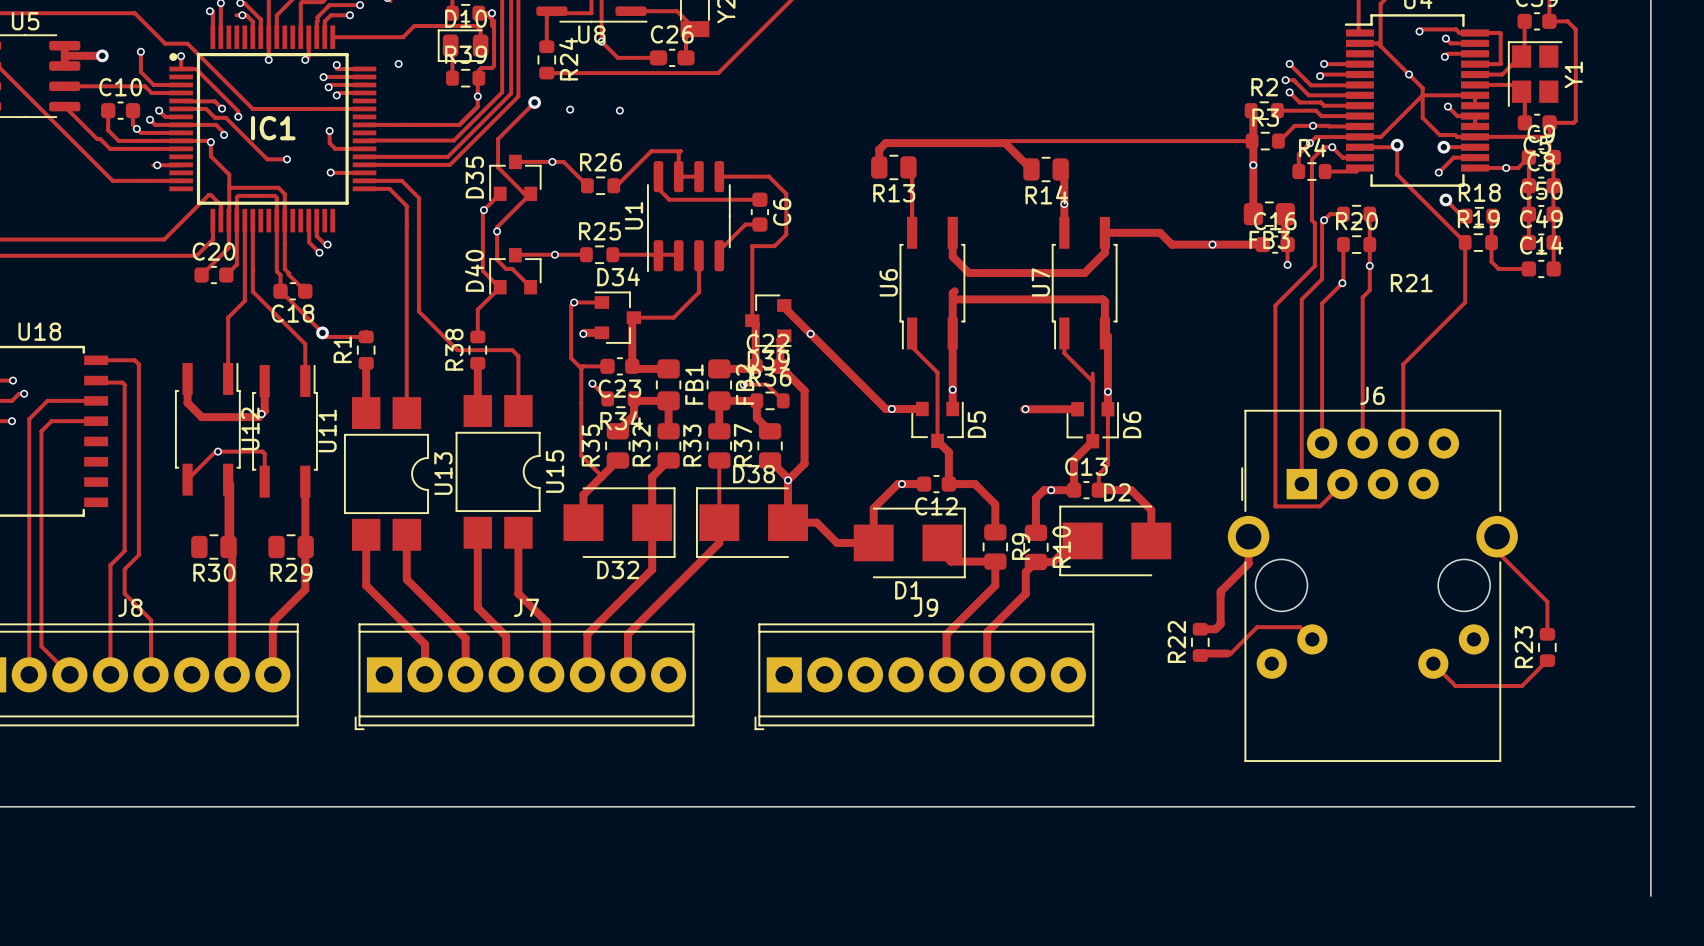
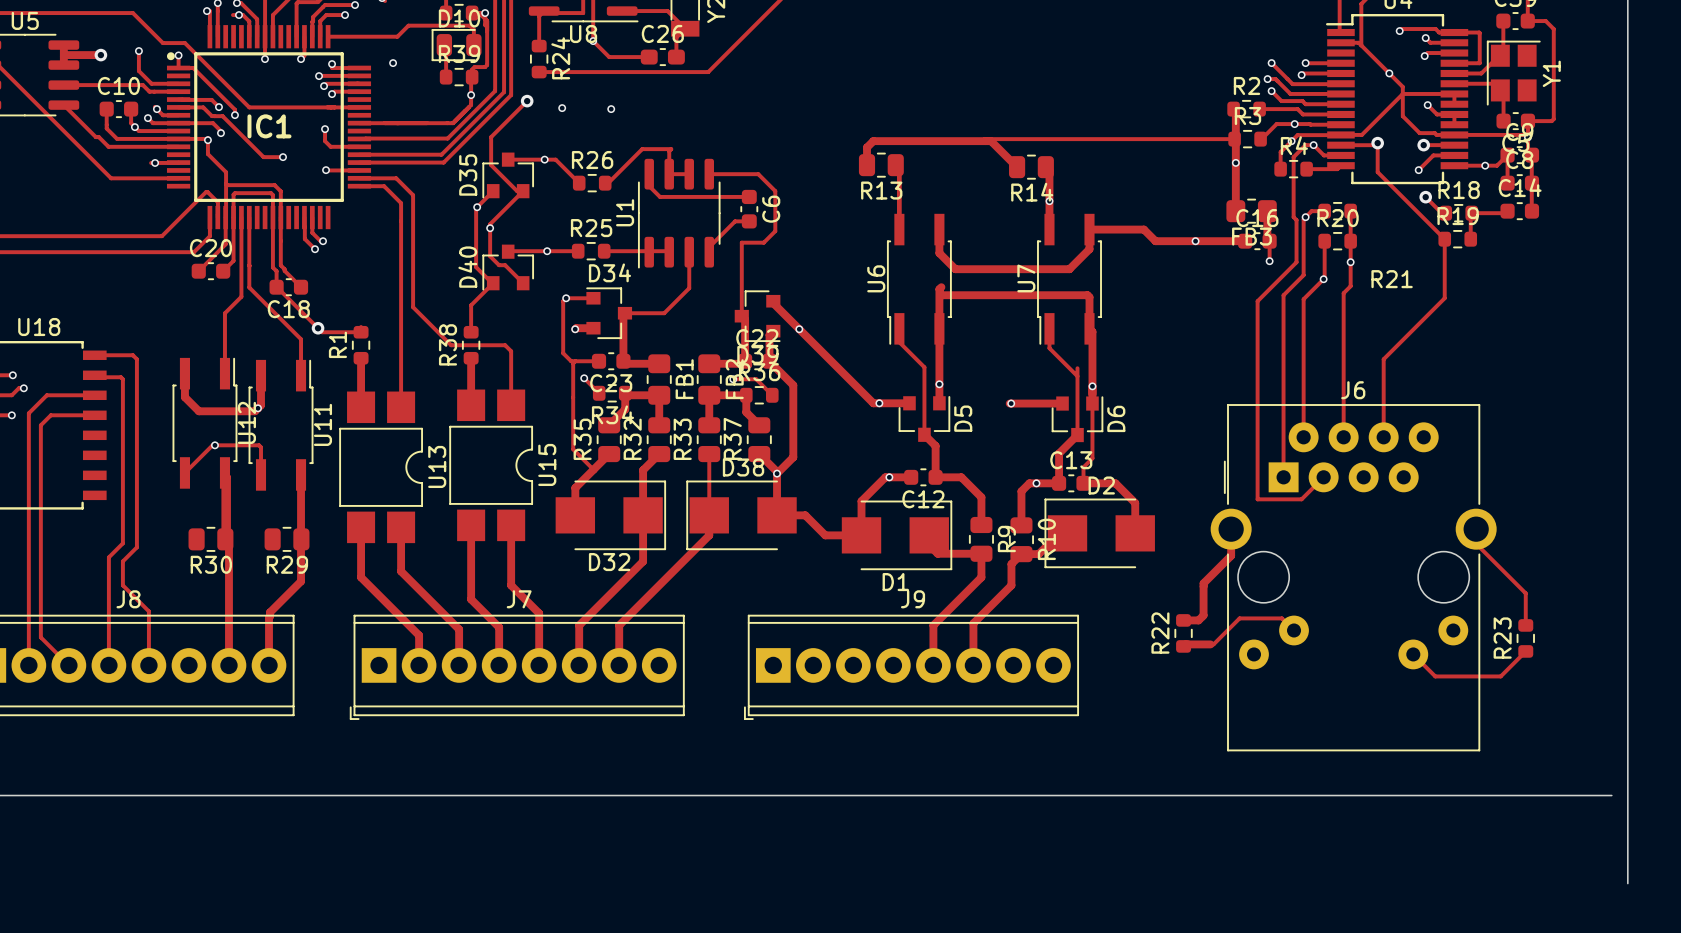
track: (1528, 185) (1528, 242) -> none
C50 name: C50 (1541, 190) -> C14 (1520, 187)
track: (1553, 214) (1553, 268) -> none
track: none -> (1471, 213) (1507, 213)
track: (1491, 242) (1491, 261) (1498, 268) (1528, 268) -> none
C49: (1541, 242) -> none
C14: (1541, 268) -> none

